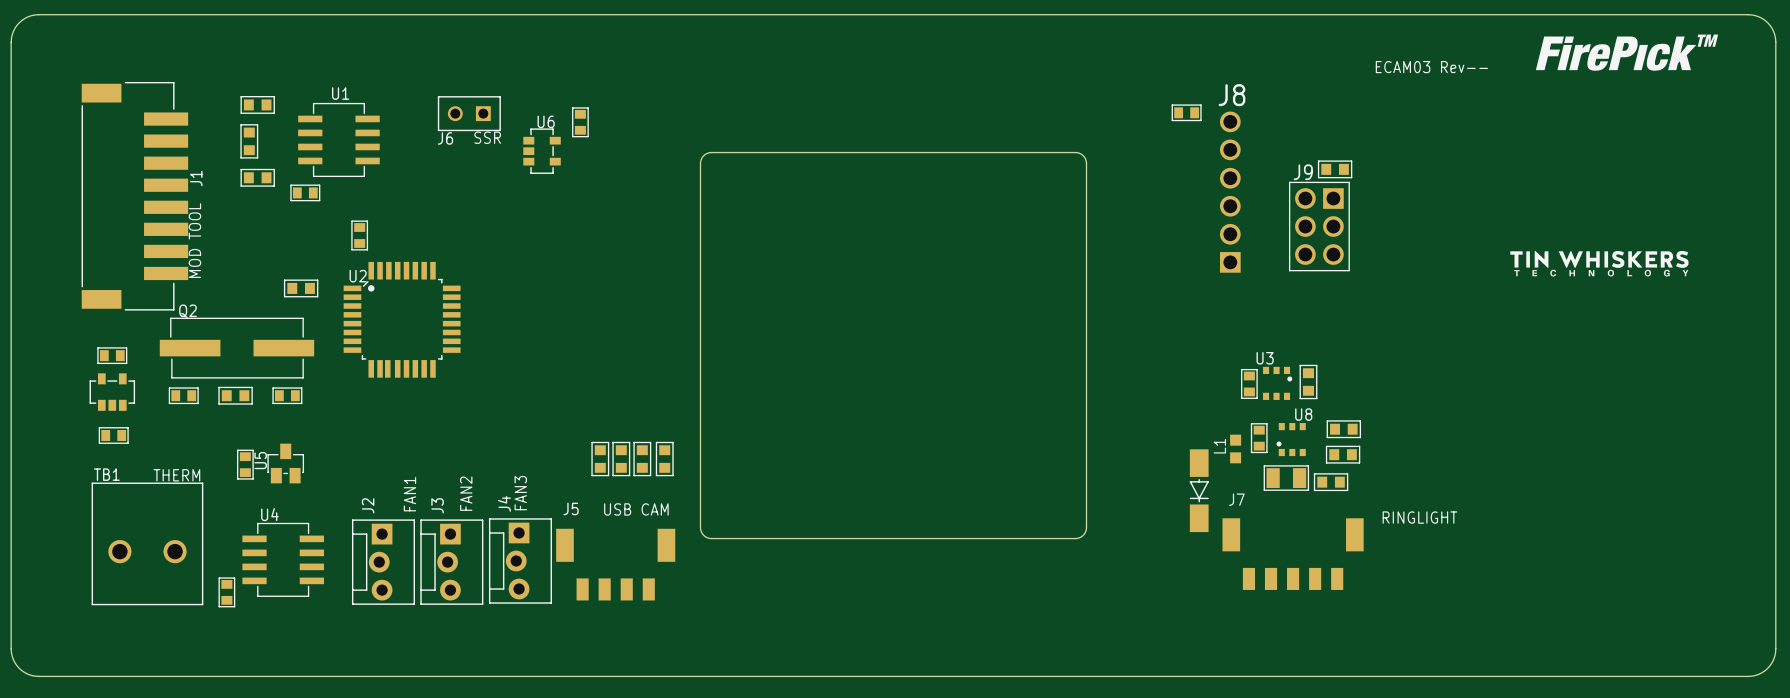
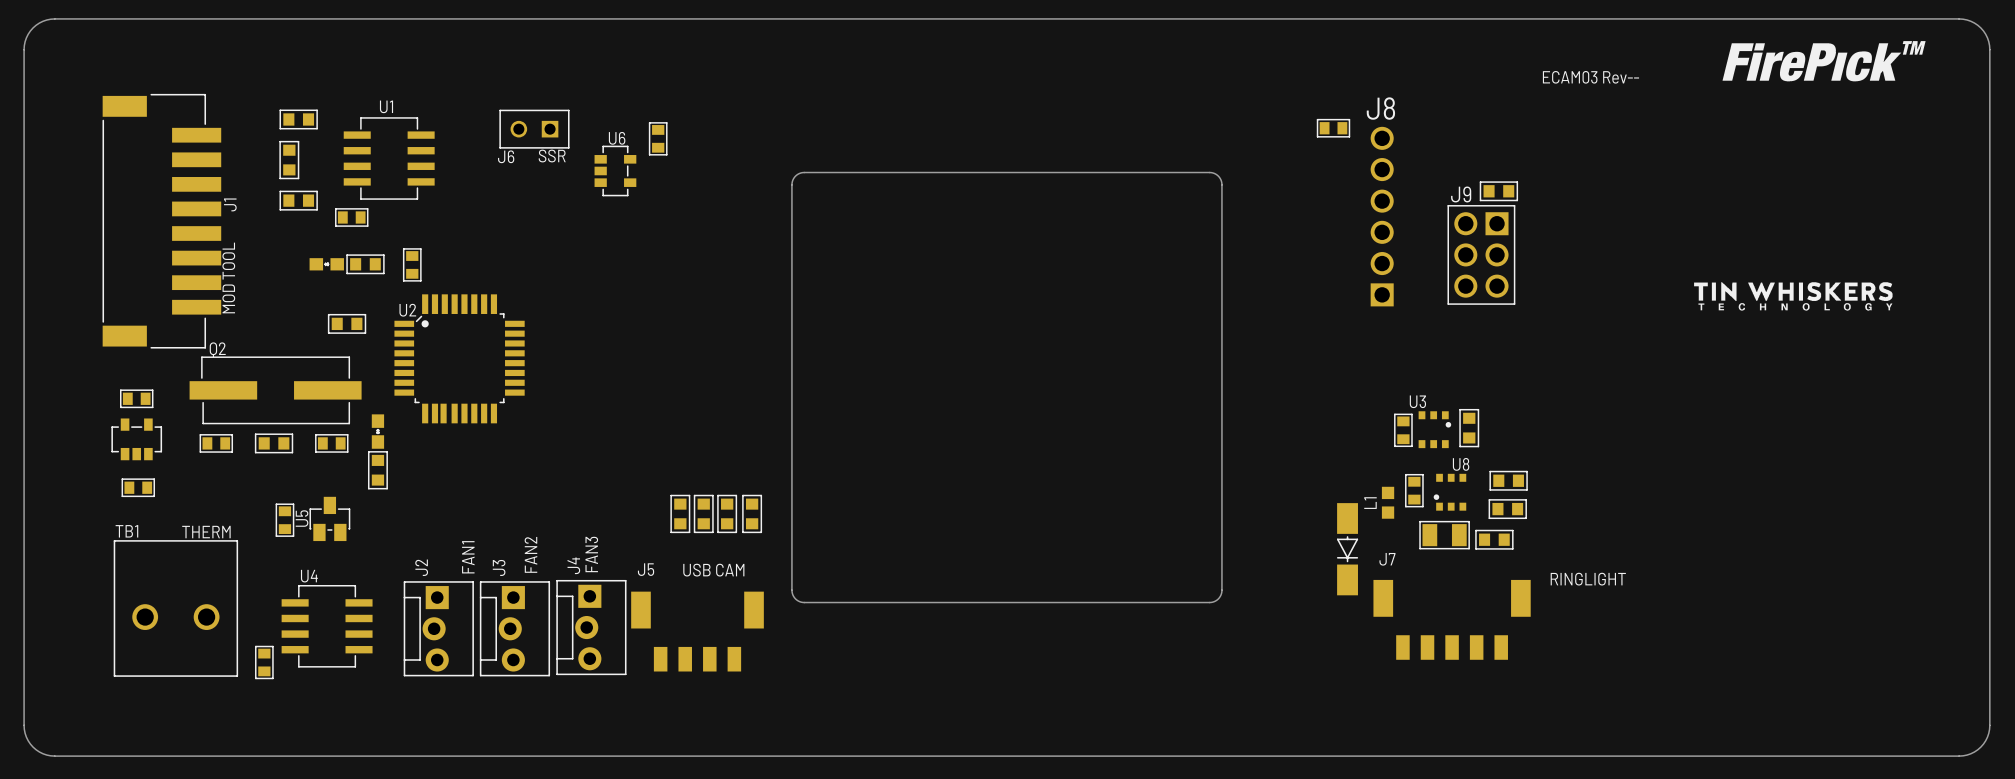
part: none -> (326, 264)
part: none -> (365, 264)
part: none -> (377, 431)
part: none -> (377, 470)

